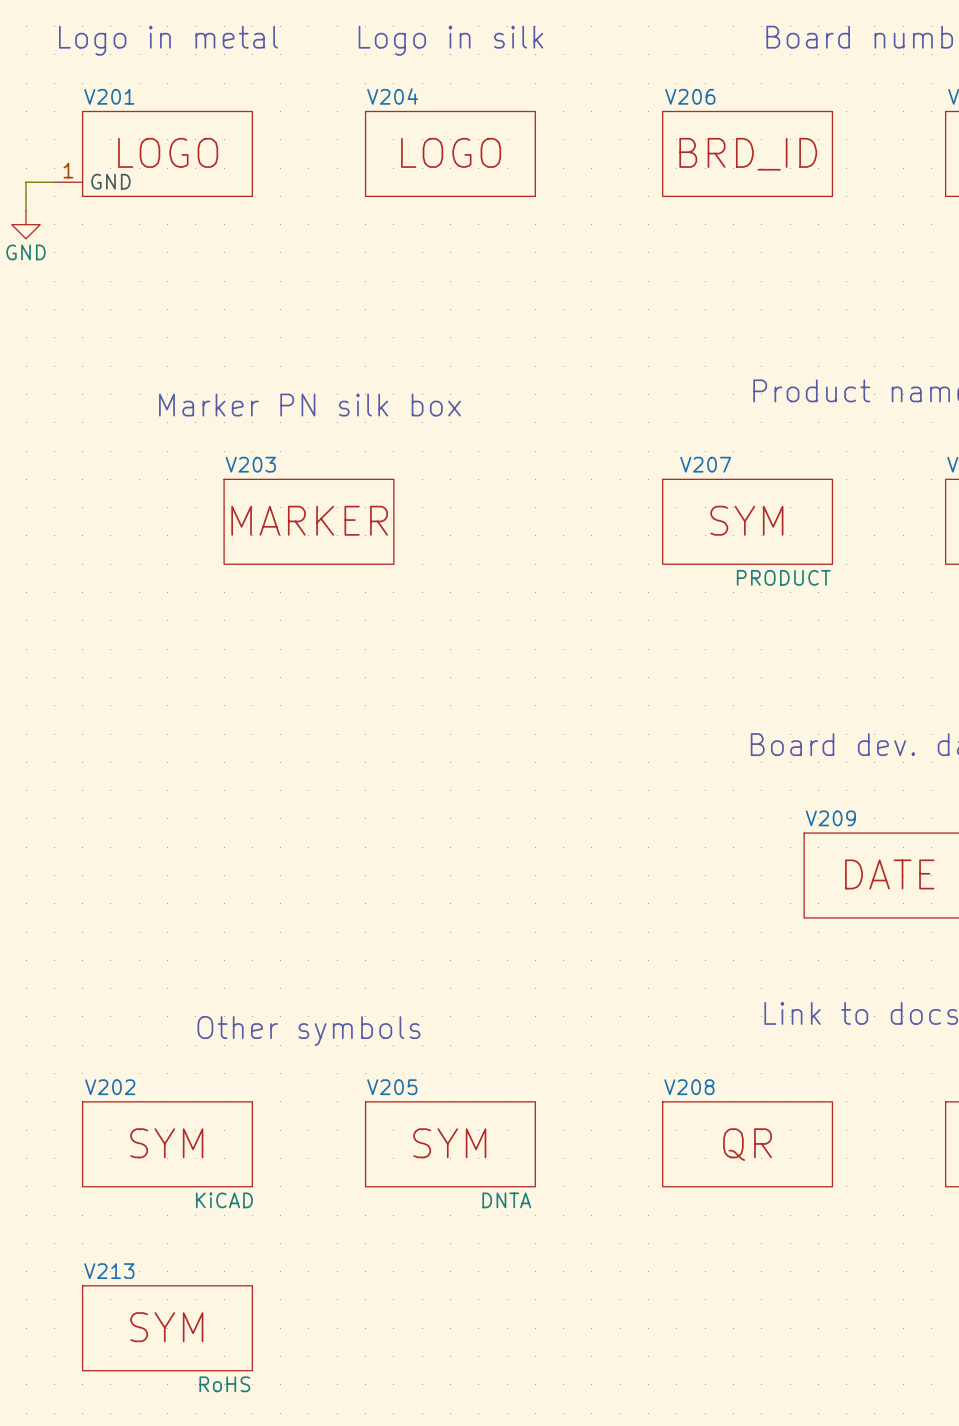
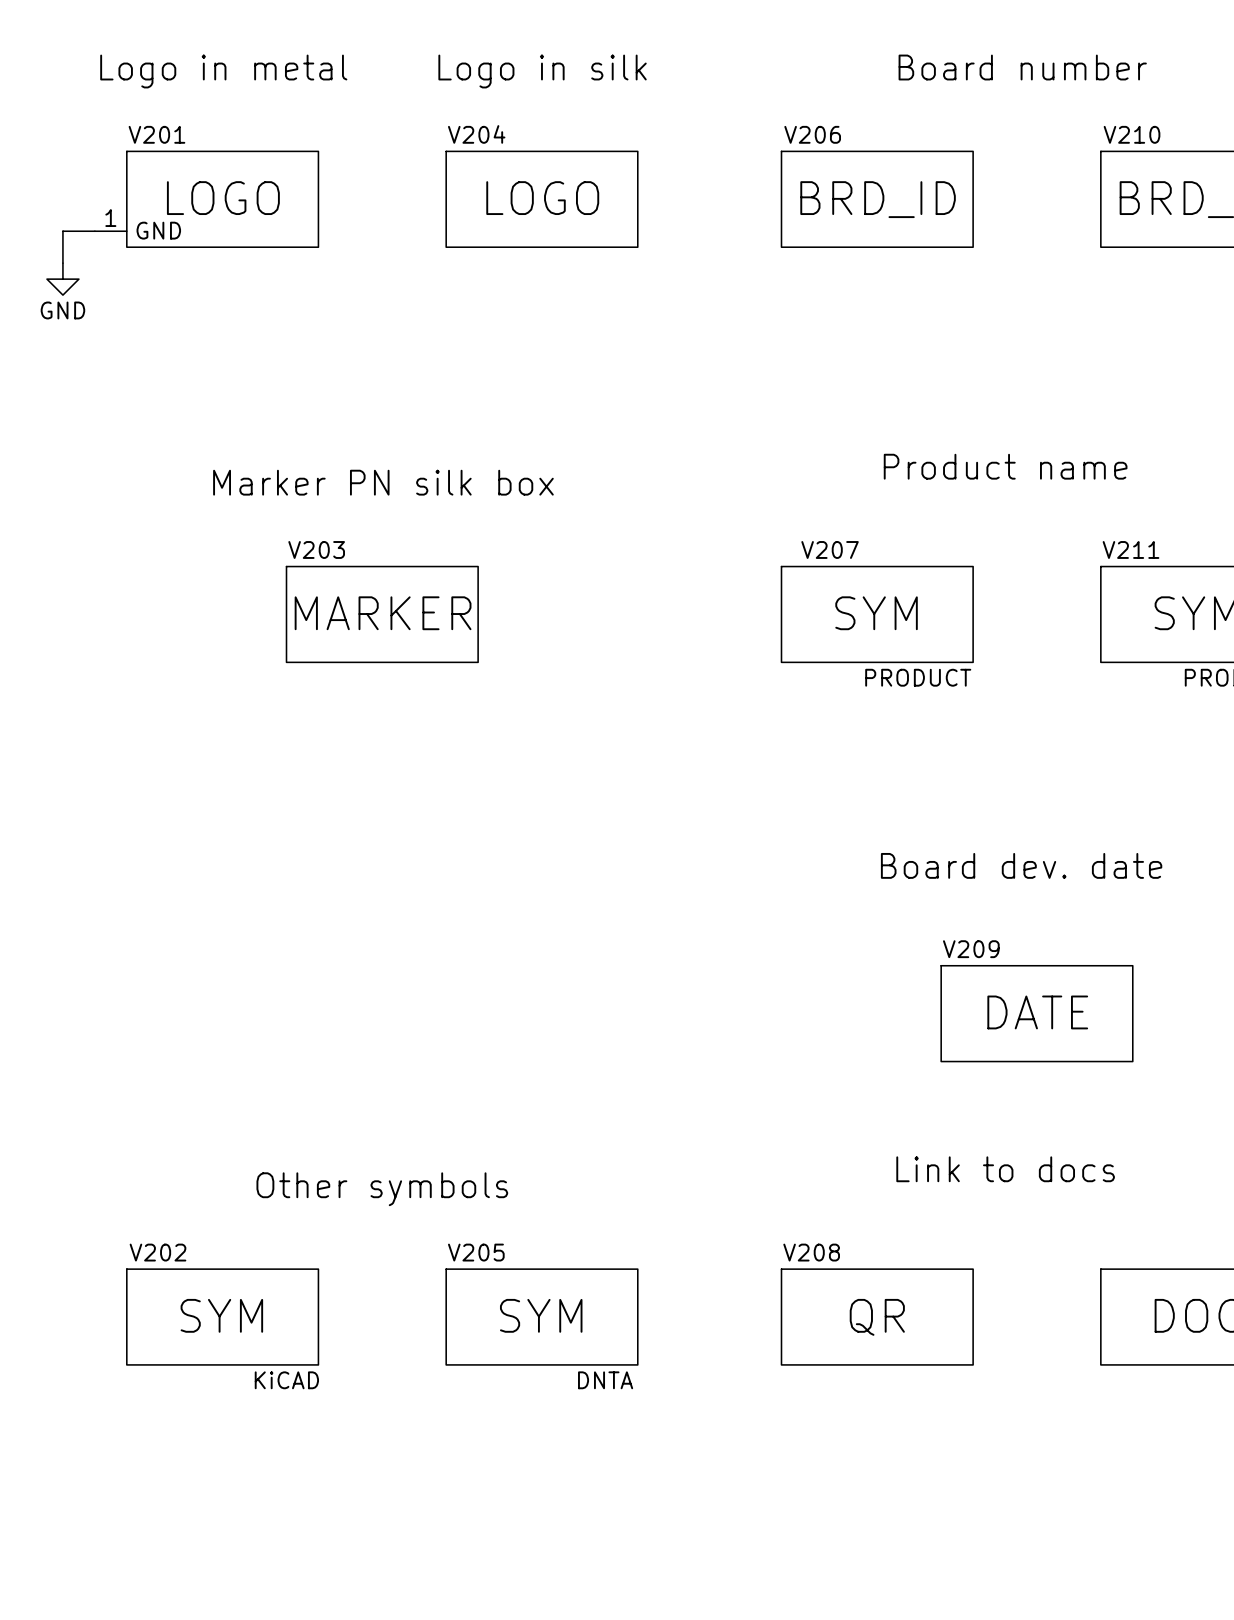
V213: RoHS (167, 1328) -> none

